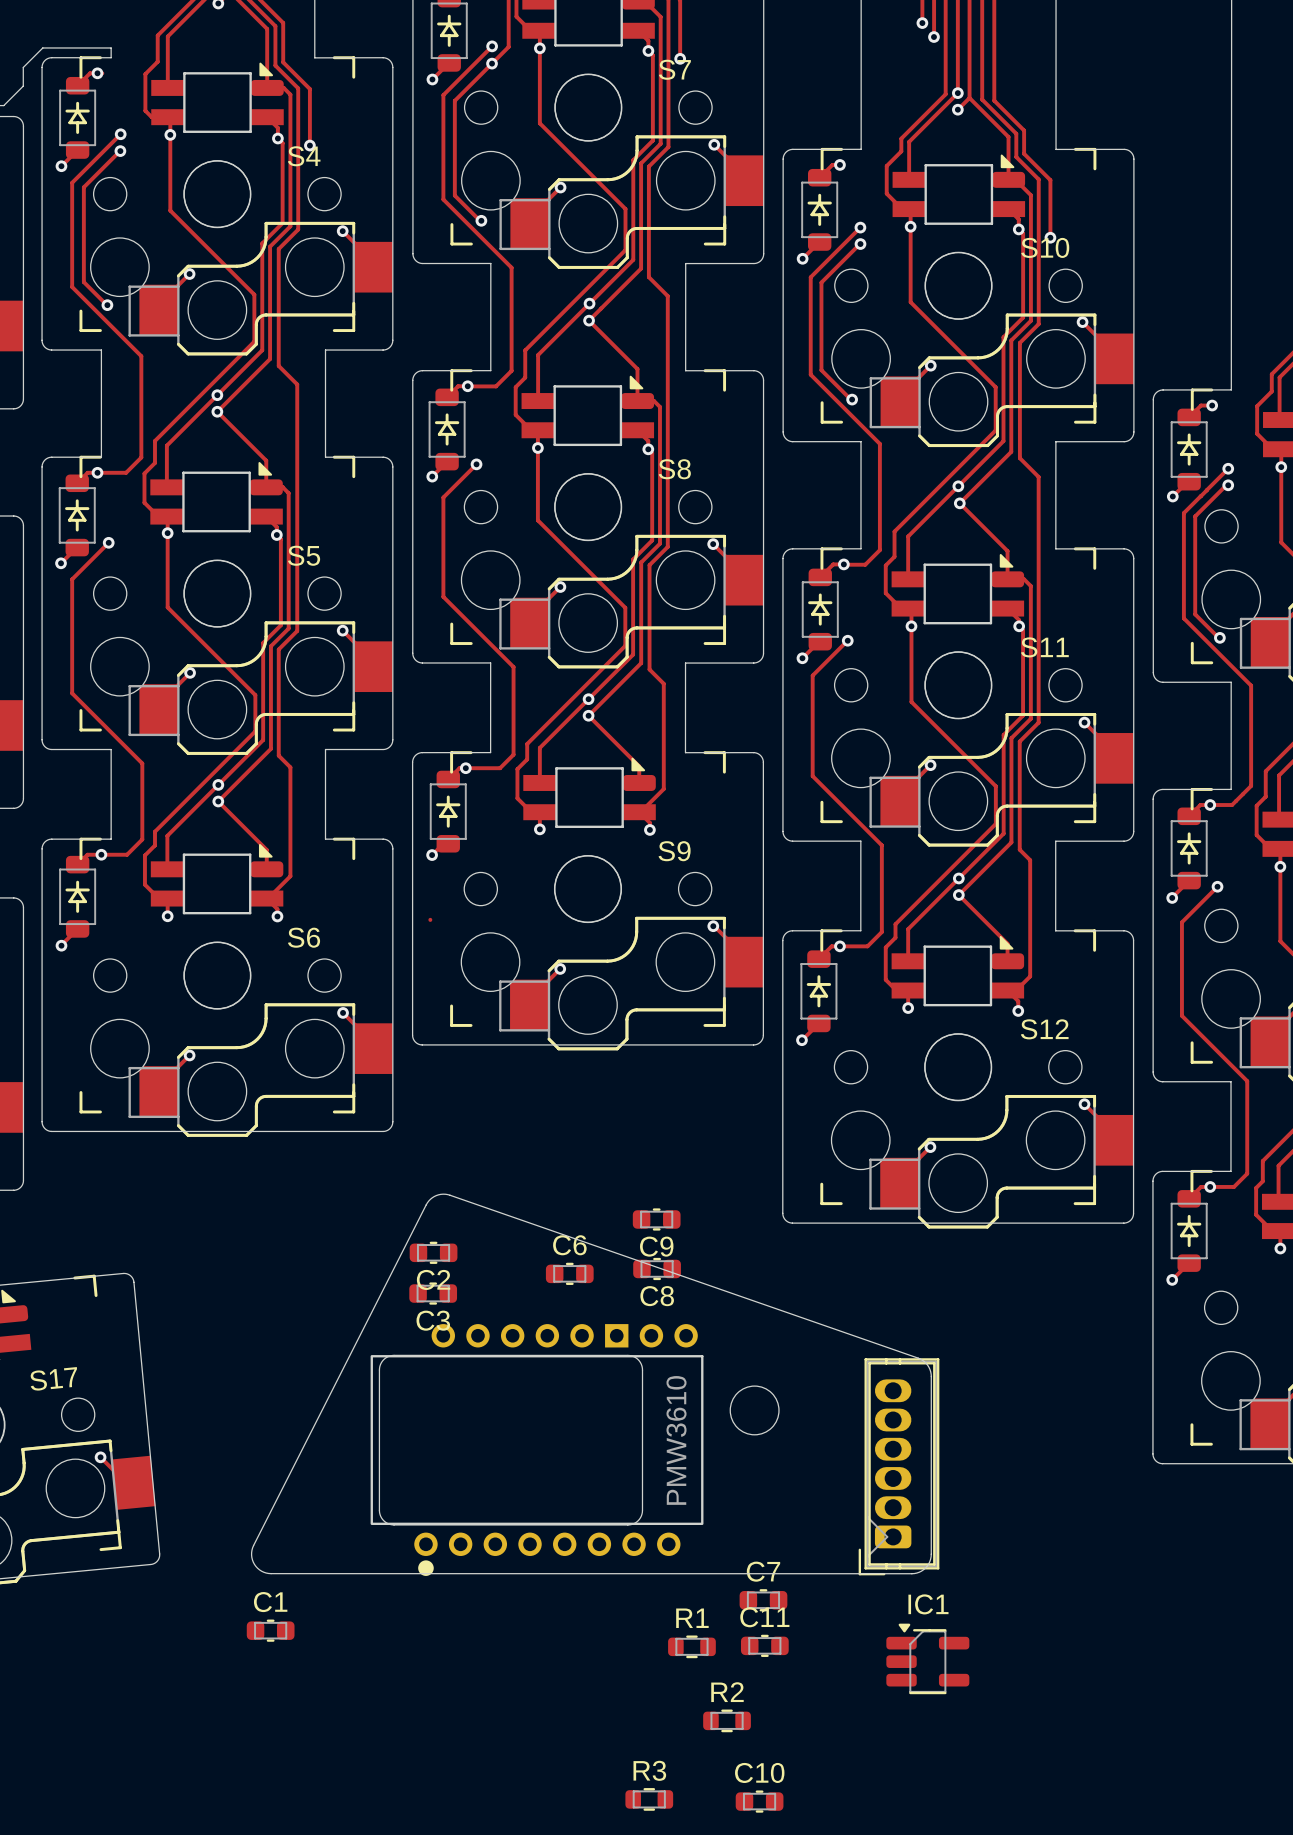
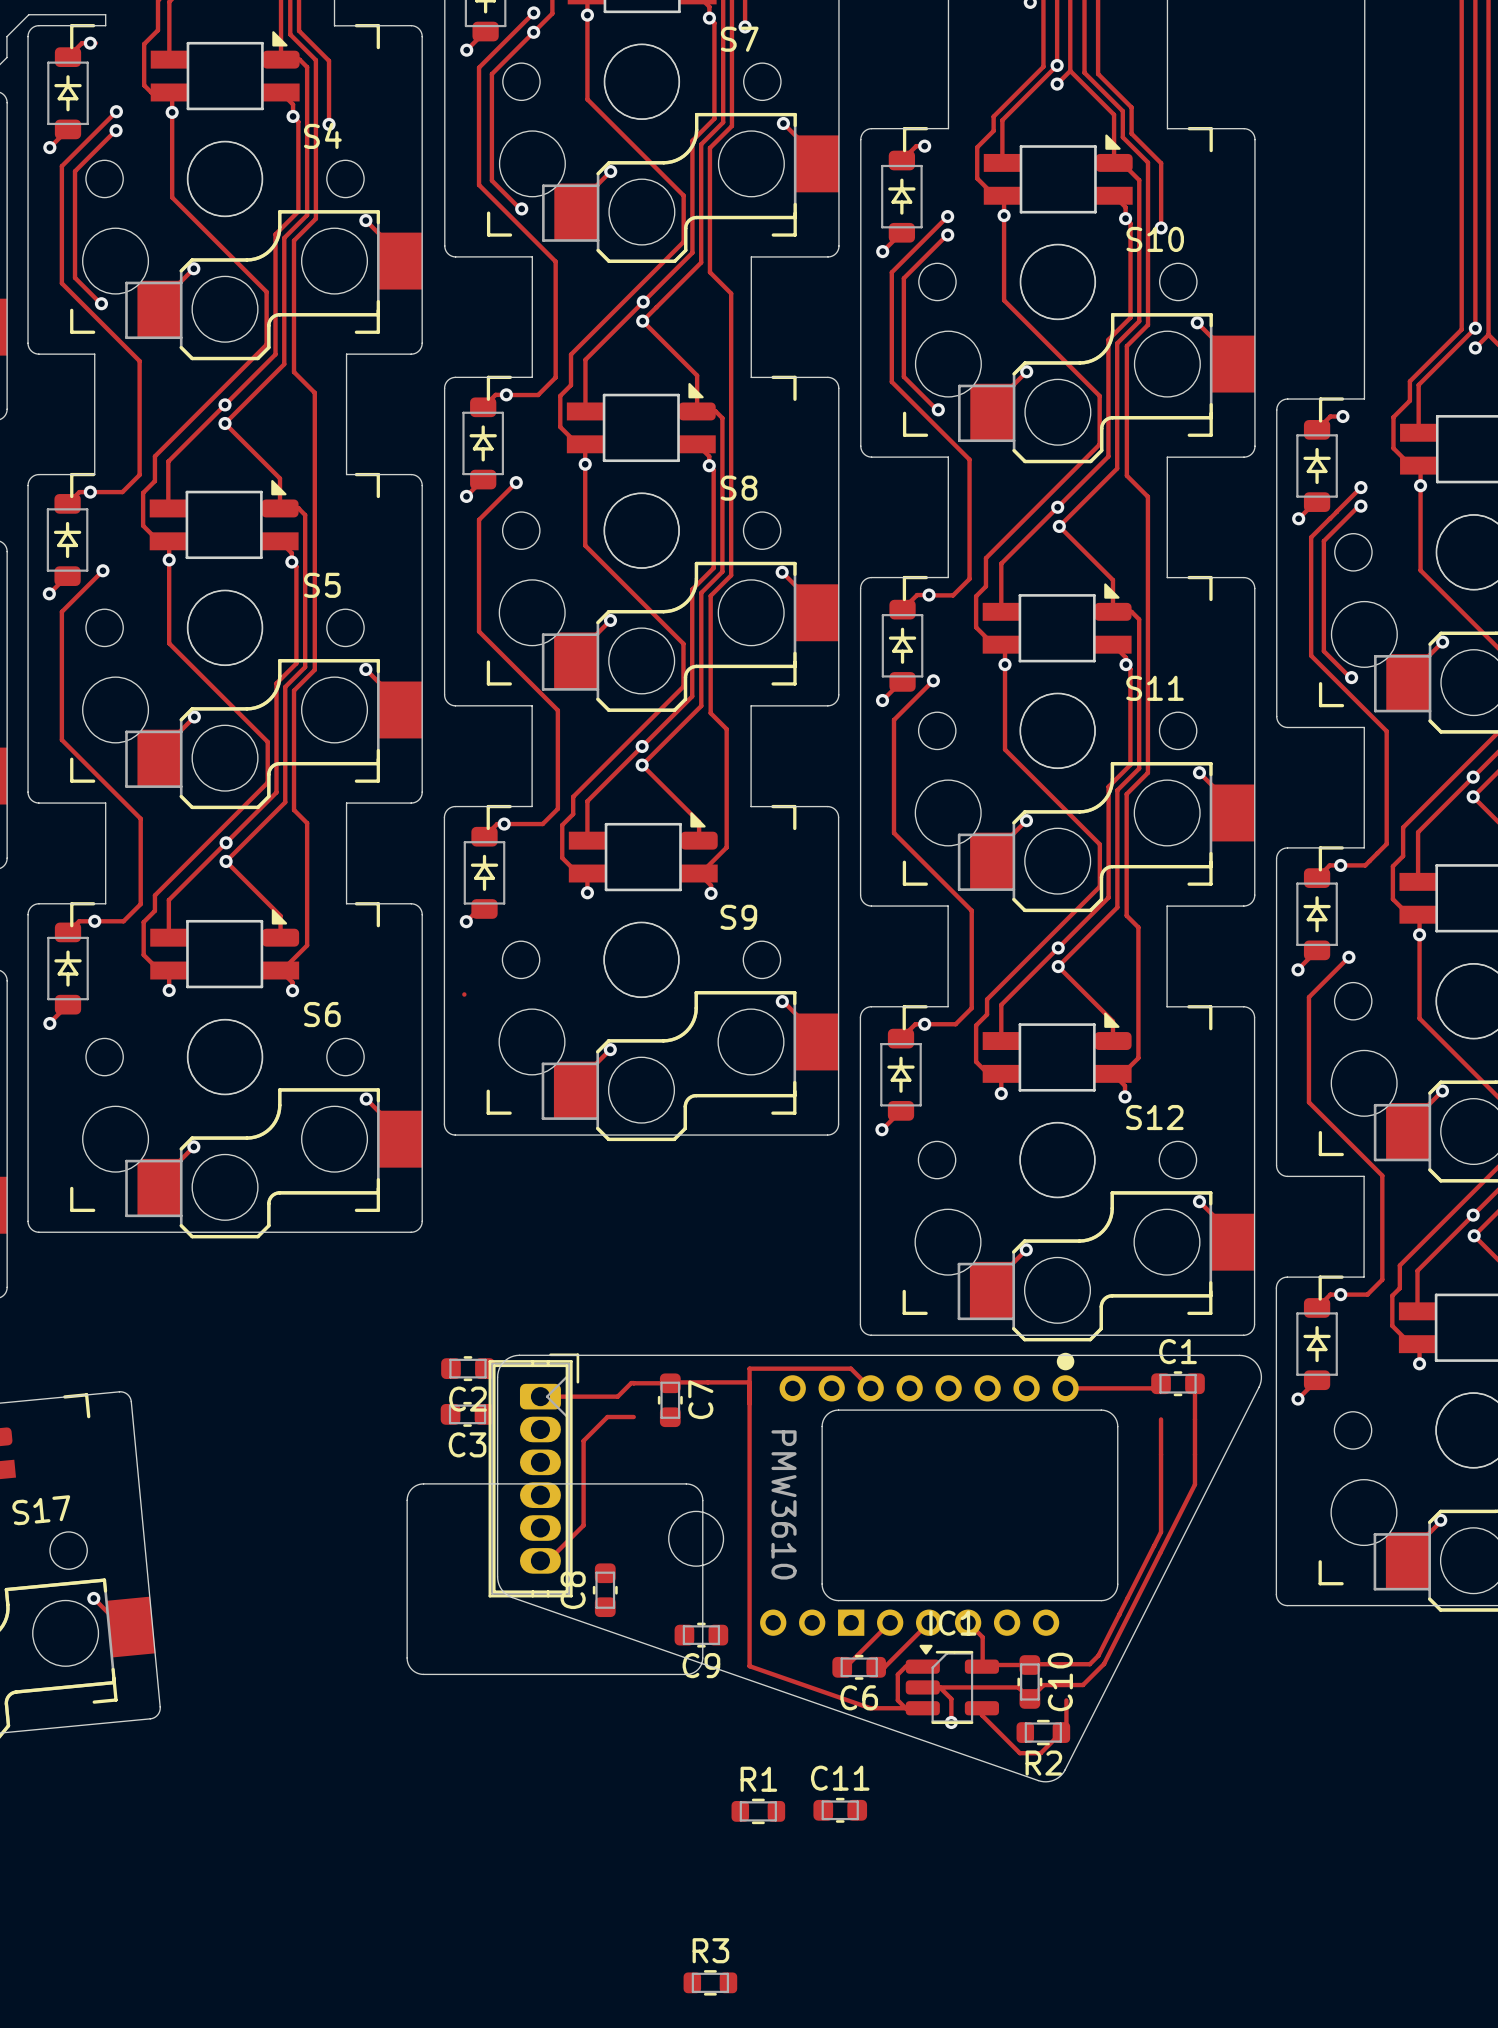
board edge: (450, 1195) (924, 1361) (929, 1369) (931, 1376) (931, 1554) (927, 1566) (919, 1572) (911, 1573) (271, 1573) (259, 1569) (252, 1559) (253, 1545) (426, 1204) (436, 1195) (450, 1195) -> none
C9 position: (656, 1219) -> (701, 1635)
board edge: none -> (519, 1355) (1239, 1355) (1250, 1358) (1256, 1363) (1260, 1370) (1261, 1379) (1259, 1387) (1065, 1769) (1058, 1777) (1046, 1781) (505, 1593) (500, 1587) (497, 1576) (497, 1377) (499, 1368) (503, 1361) (511, 1357) (519, 1355)
C6 name position: C6 (569, 1245) -> C6 (859, 1697)
track: none -> (633, 1383) (631, 1383) (617, 1396) (540, 1396)
track: none -> (749, 1382) (633, 1383)
track: none -> (1161, 1383) (1157, 1383) (1152, 1388) (1065, 1388)
track: none -> (1194, 1383) (1194, 1484) (1104, 1663) (1082, 1685) (1043, 1685) (1029, 1698) (1018, 1687) (922, 1687)
C8 rotation: 0° (657, 1268) -> 90° clockwise (605, 1590)
C8 position: (657, 1268) -> (605, 1590)
track: none -> (870, 1388) (850, 1368) (749, 1368) (749, 1666) (870, 1708) (922, 1708)
C6 position: (569, 1273) -> (859, 1667)
board edge: none -> (838, 1410) (1101, 1410) (1110, 1412) (1116, 1419) (1117, 1426) (1117, 1584) (1115, 1592) (1110, 1598) (1101, 1600) (838, 1600) (829, 1598) (823, 1591) (822, 1584) (822, 1426) (826, 1414) (838, 1410)
track: none -> (633, 1417) (607, 1417) (583, 1440) (583, 1525) (548, 1560) (540, 1560)
track: none -> (1161, 1419) (1161, 1532) (1098, 1655) (1089, 1664) (983, 1665) (981, 1666)
part: none -> PMW3610 (919, 1494)
round board edge position: (754, 1410) -> (696, 1538)
part: PMW3610 (537, 1450) -> none
part rotation: 0° (899, 1466) -> 180° (533, 1475)
part position: (899, 1466) -> (533, 1475)
track: none -> (890, 1622) (845, 1667) (842, 1667)
track: none -> (929, 1622) (884, 1667) (876, 1667)
track: none -> (963, 1627) (968, 1622) (982, 1637) (982, 1665)
track: none -> (922, 1666) (905, 1666) (897, 1674) (897, 1700) (905, 1708)
track: none -> (939, 1687) (951, 1698) (951, 1722)
track: none -> (1066, 1700) (1066, 1727) (1040, 1753) (1019, 1753) (981, 1715) (981, 1708)
via: none -> (951, 1722)
C7 rotation: 0° (763, 1600) -> 90° clockwise (670, 1400)
C7 position: (763, 1600) -> (670, 1400)
C1 position: (270, 1630) -> (1178, 1383)
IC1 position: (927, 1658) -> (952, 1684)
R2 name position: R2 (727, 1692) -> R2 (1043, 1763)
R2 position: (727, 1720) -> (1043, 1732)
C10 rotation: 0° (759, 1801) -> 90° clockwise (1029, 1681)
C10 position: (759, 1801) -> (1029, 1681)

